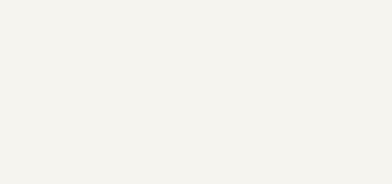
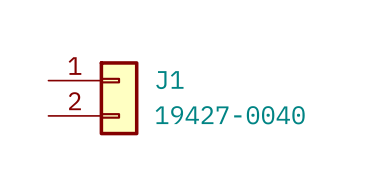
J1: none -> 19427-0040 (93, 98)

